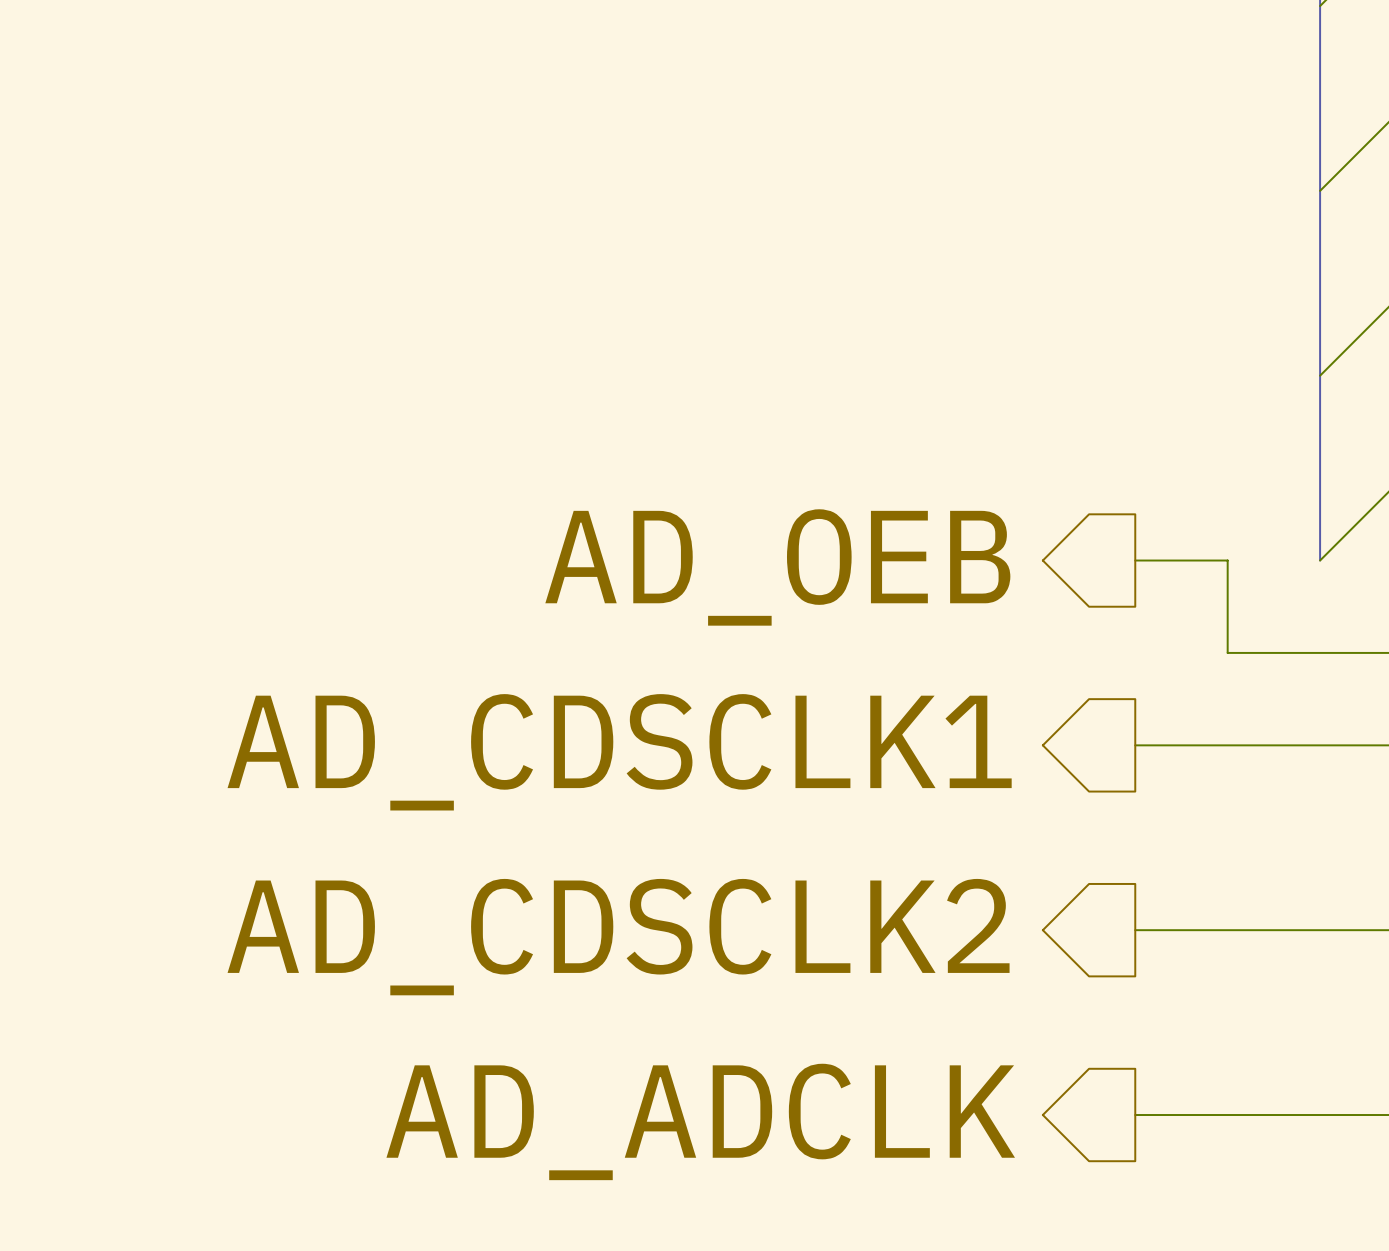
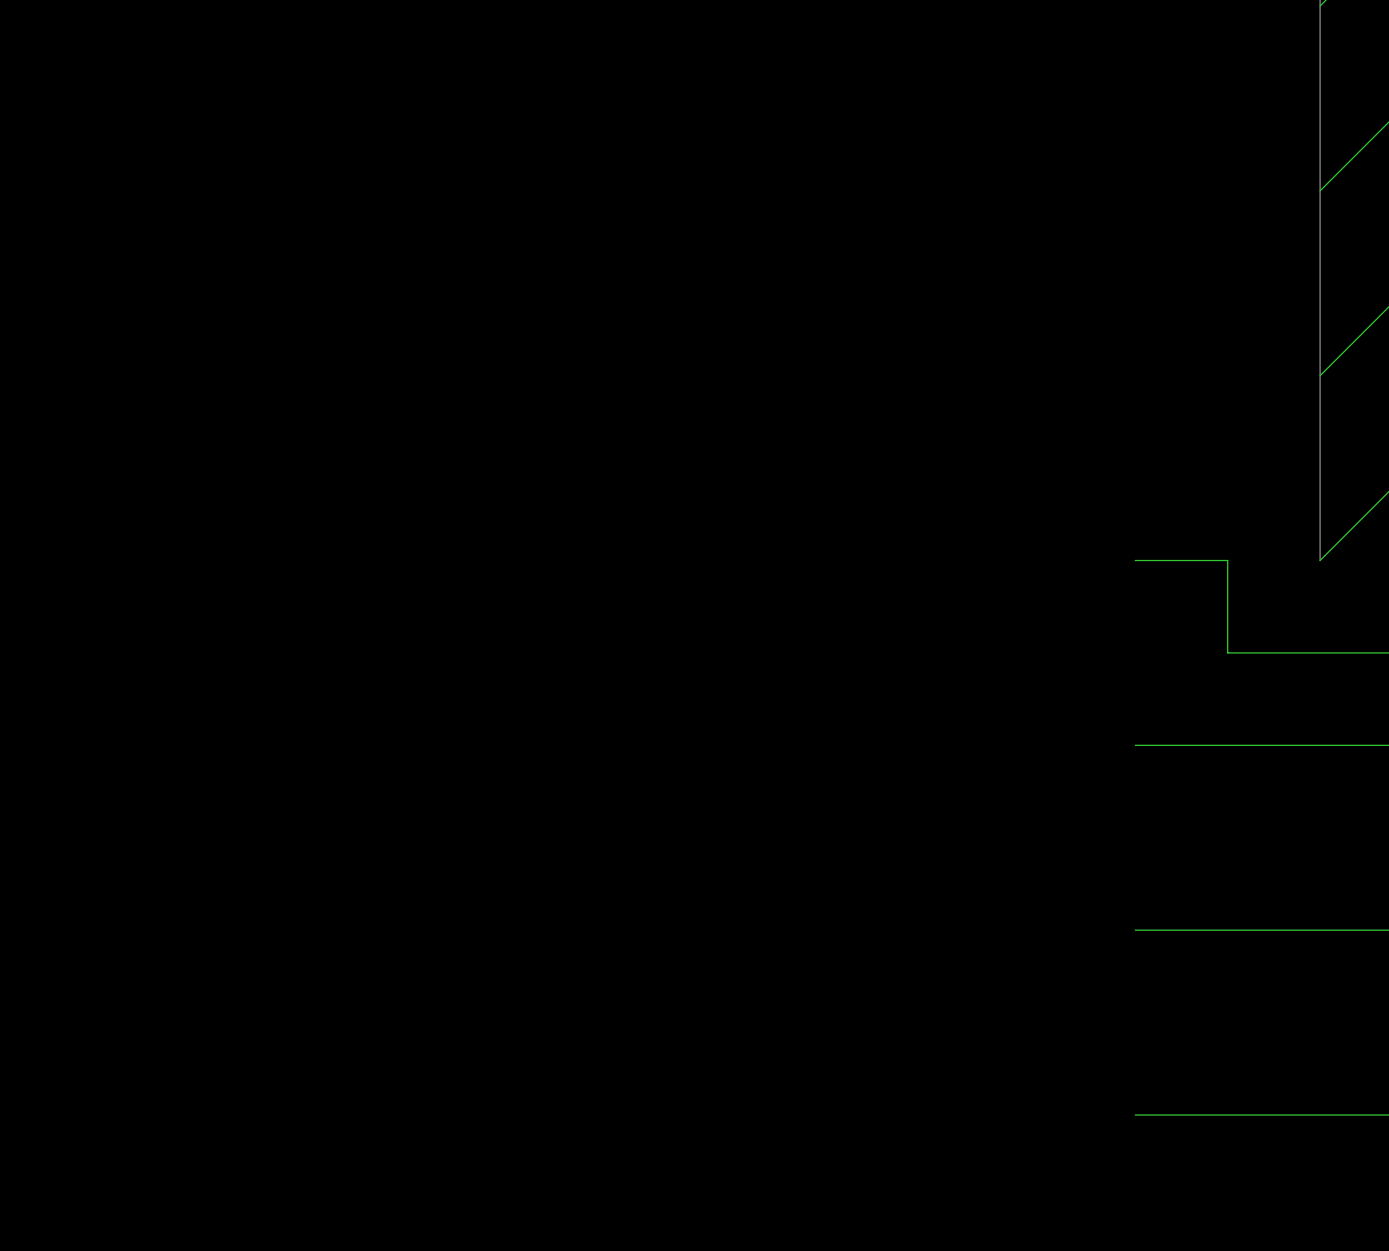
hierarchical label: AD_OEB (777, 567) -> none
hierarchical label: AD_CDSCLK1 (619, 752) -> none
hierarchical label: AD_CDSCLK2 (618, 937) -> none
hierarchical label: AD_ADCLK (700, 1121) -> none

